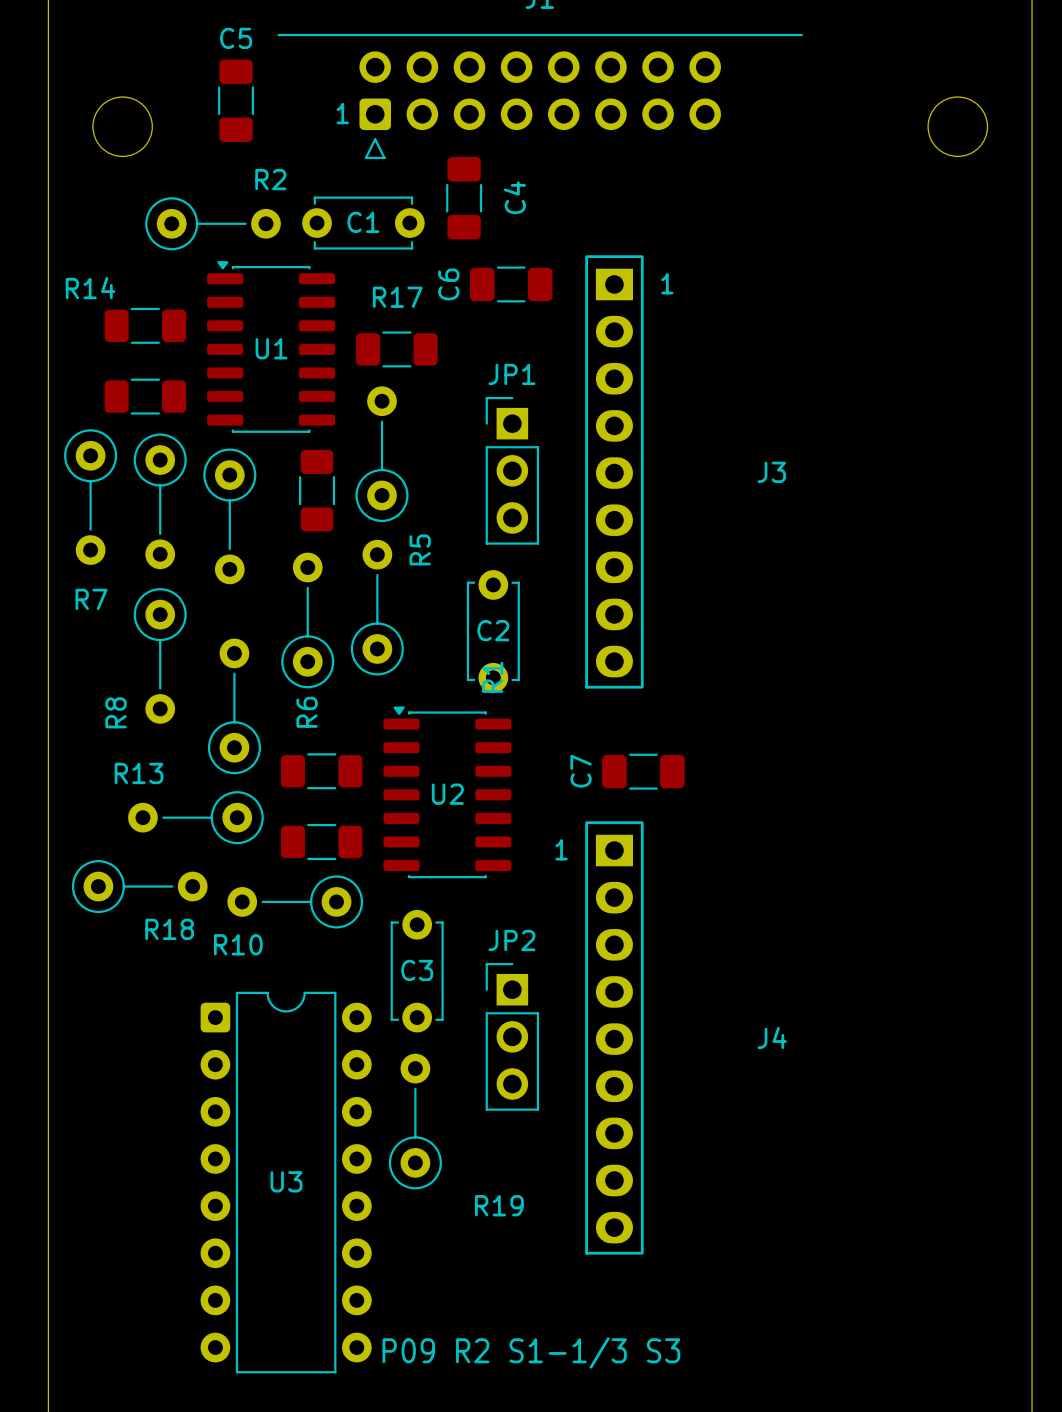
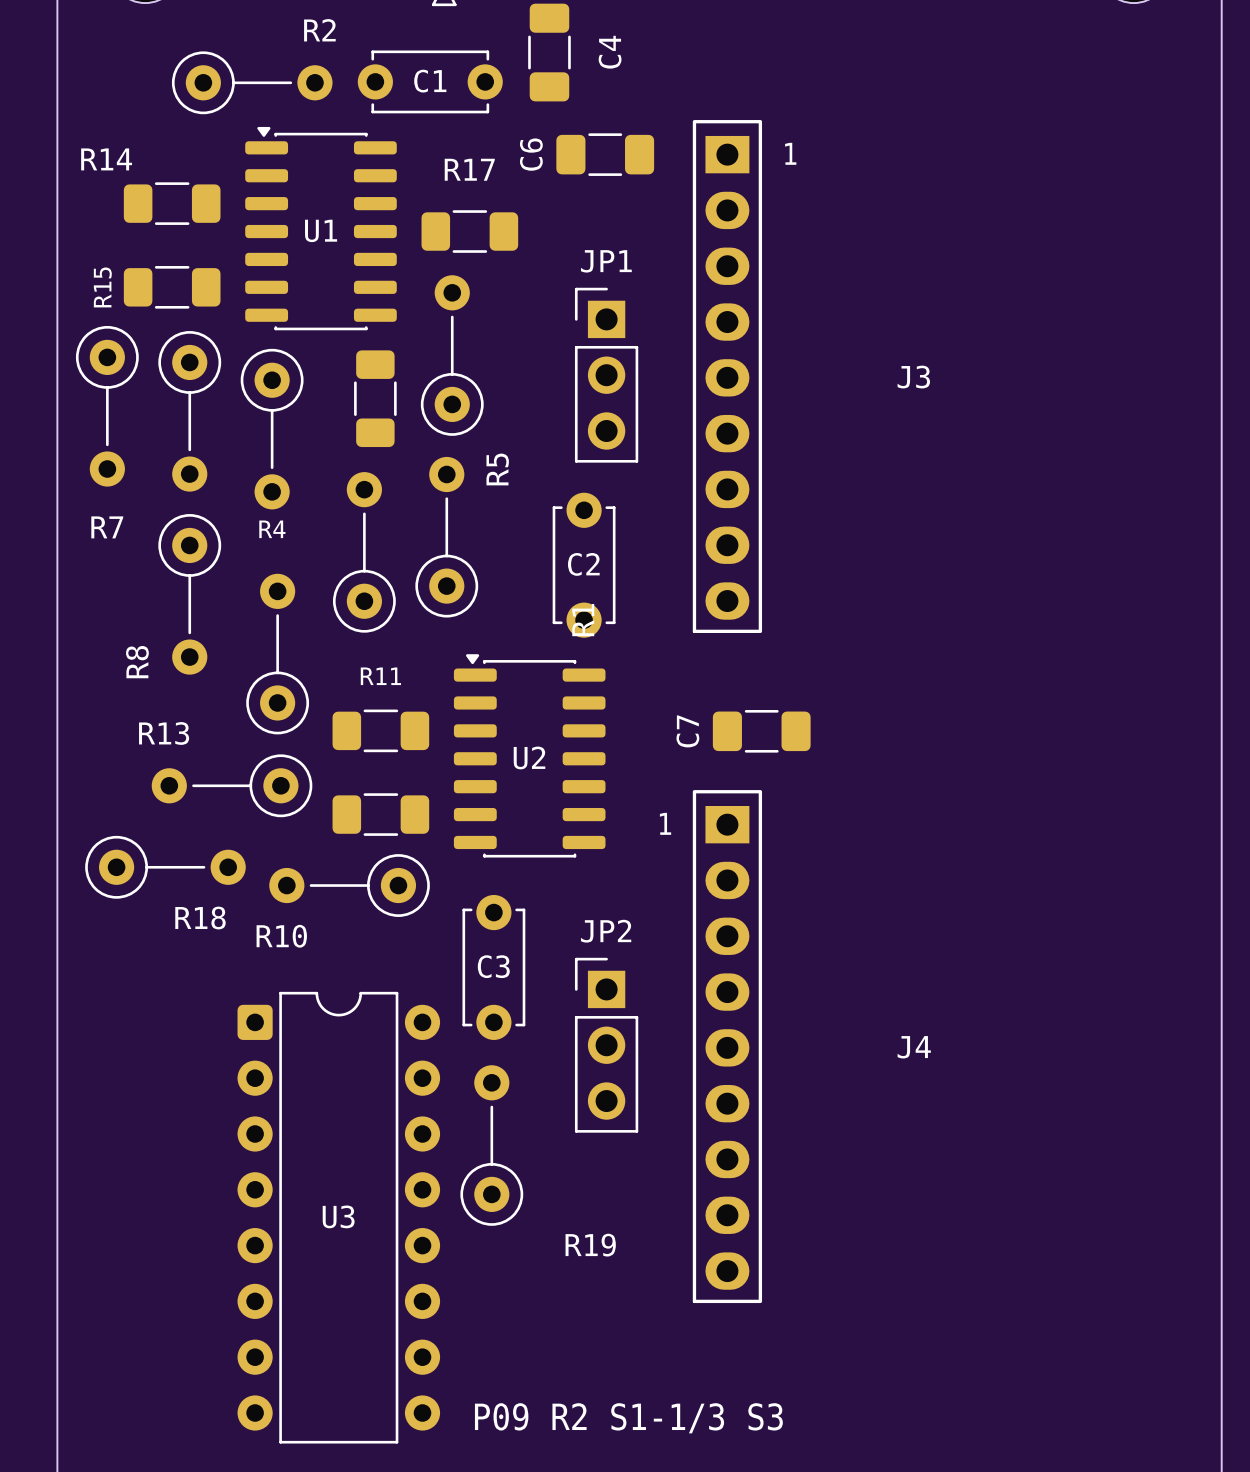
R15 name: none -> R15 (102, 287)
R4 name: none -> R4 (272, 529)
R6 name: R6 (307, 712) -> none
R11 name: none -> R11 (380, 676)

